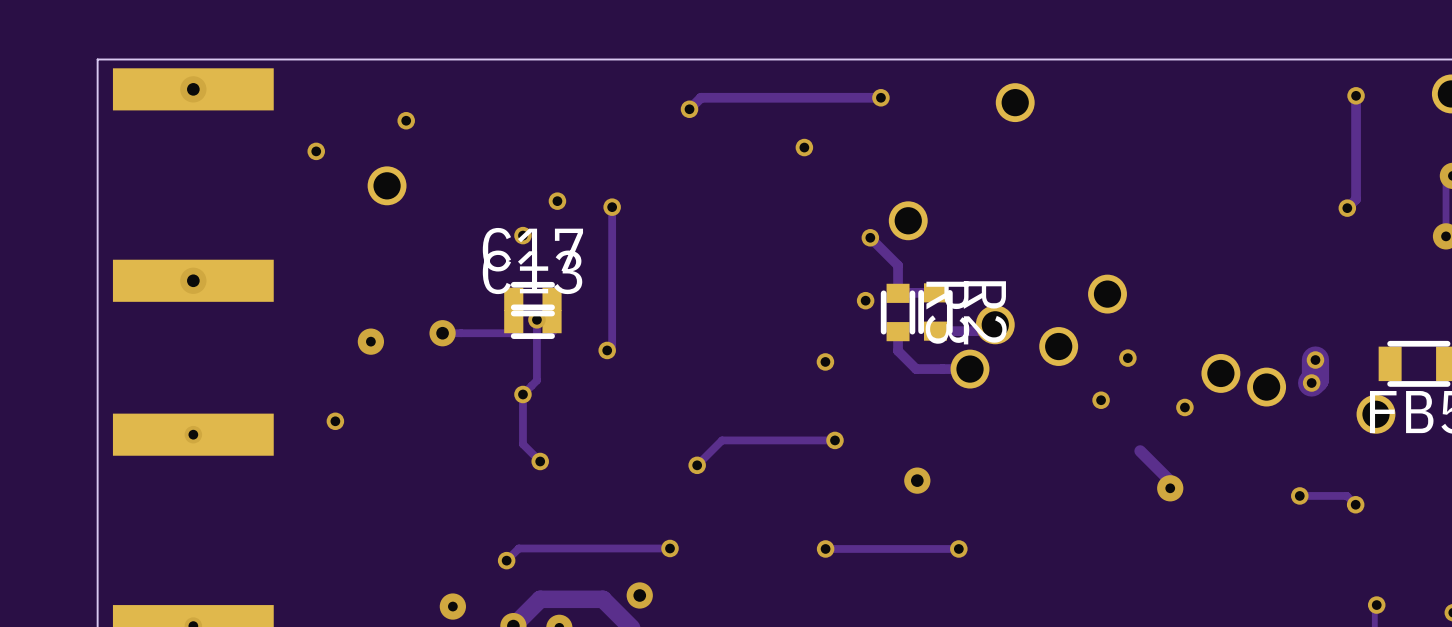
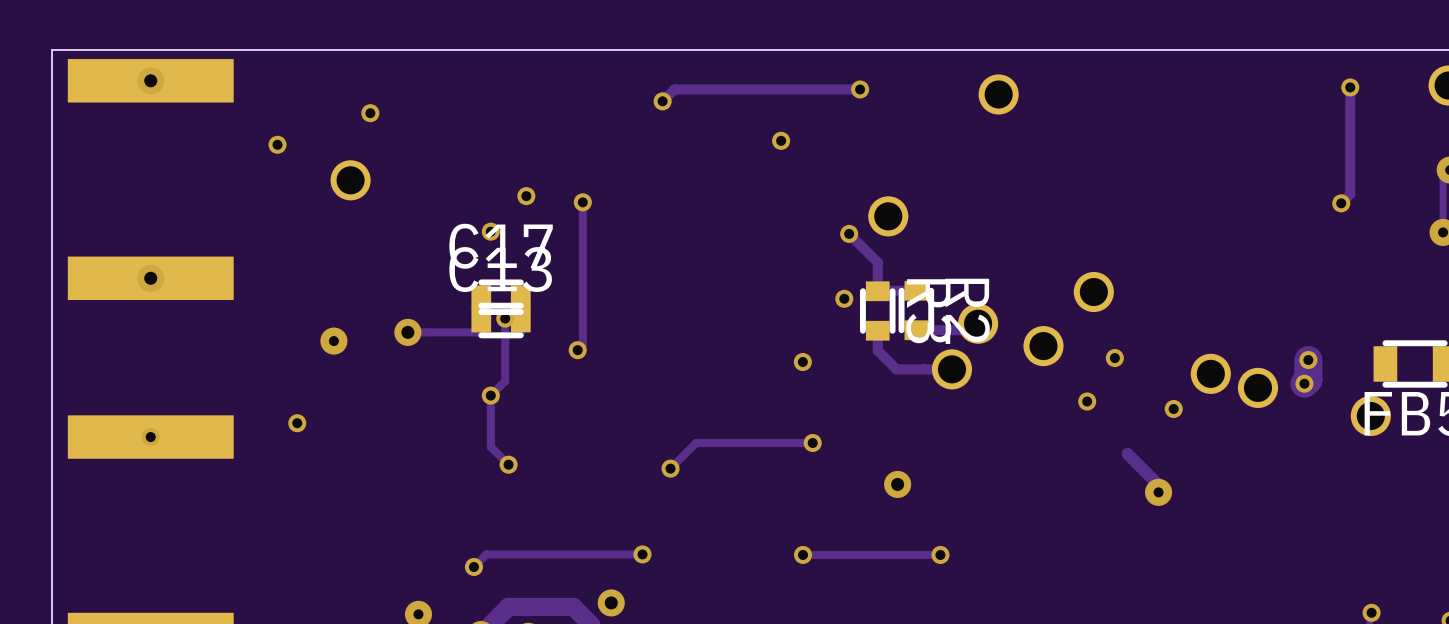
track: (1299, 495) (1346, 495) (1355, 504) -> none
via: (1299, 495) -> none
via: (1355, 504) -> none

